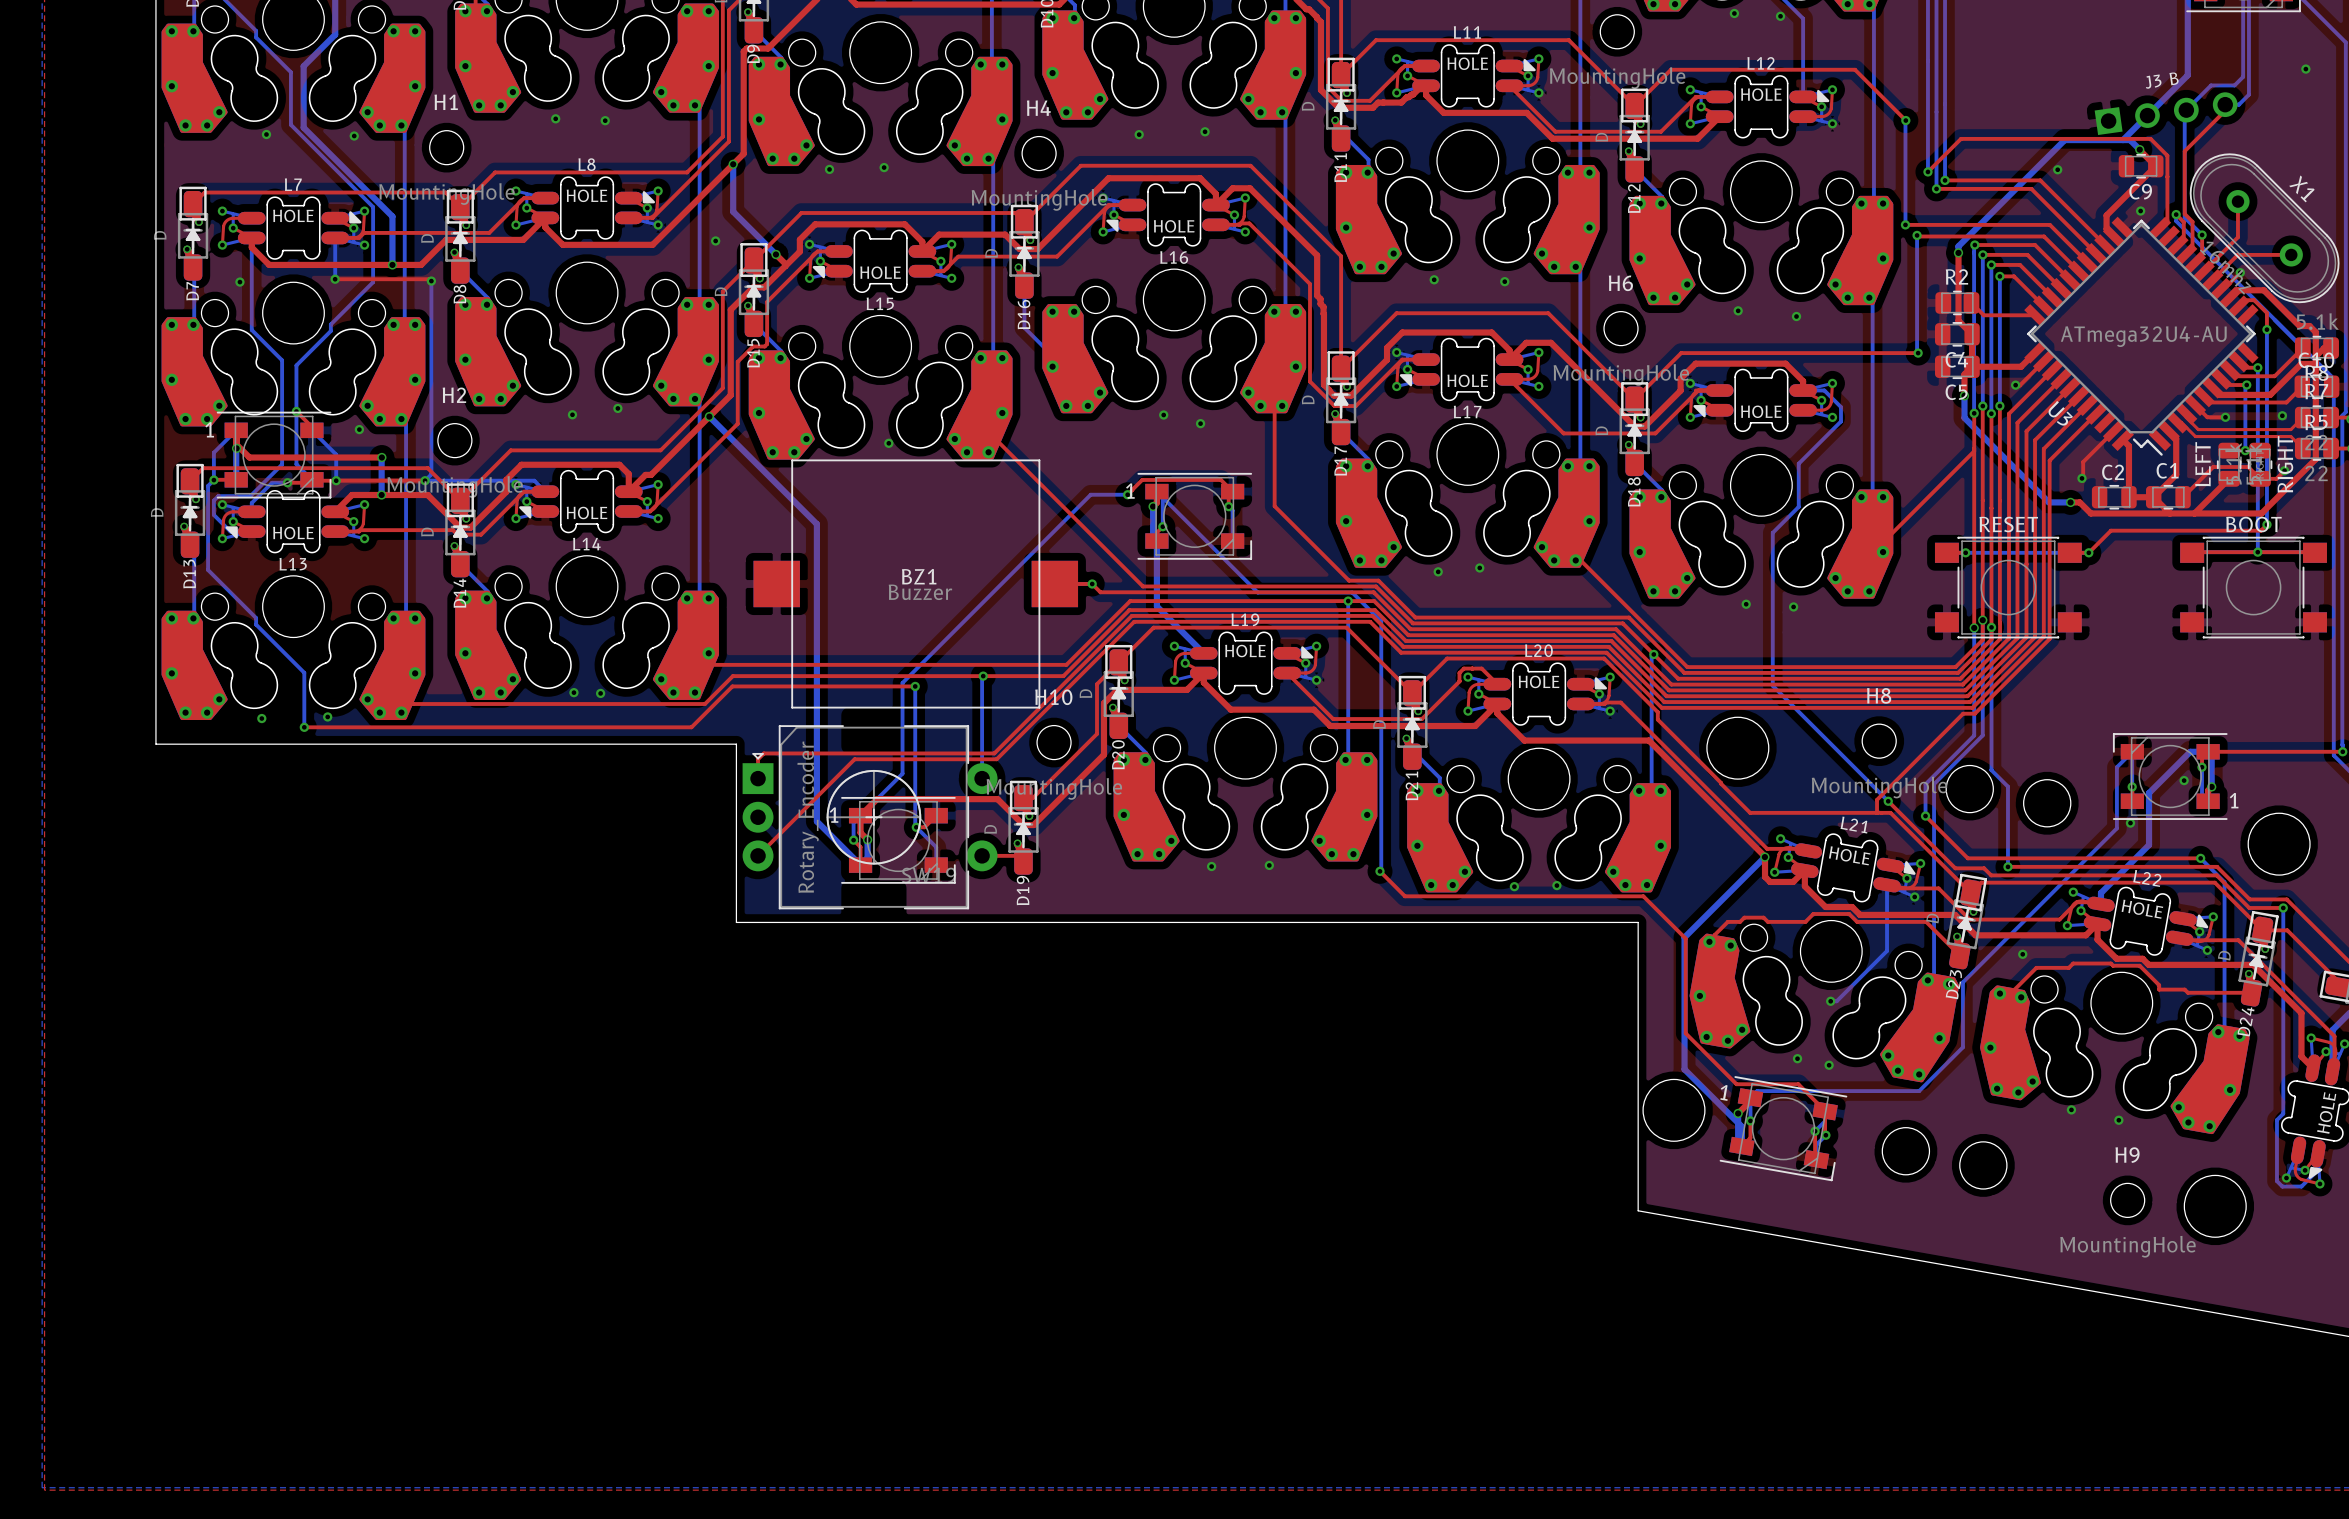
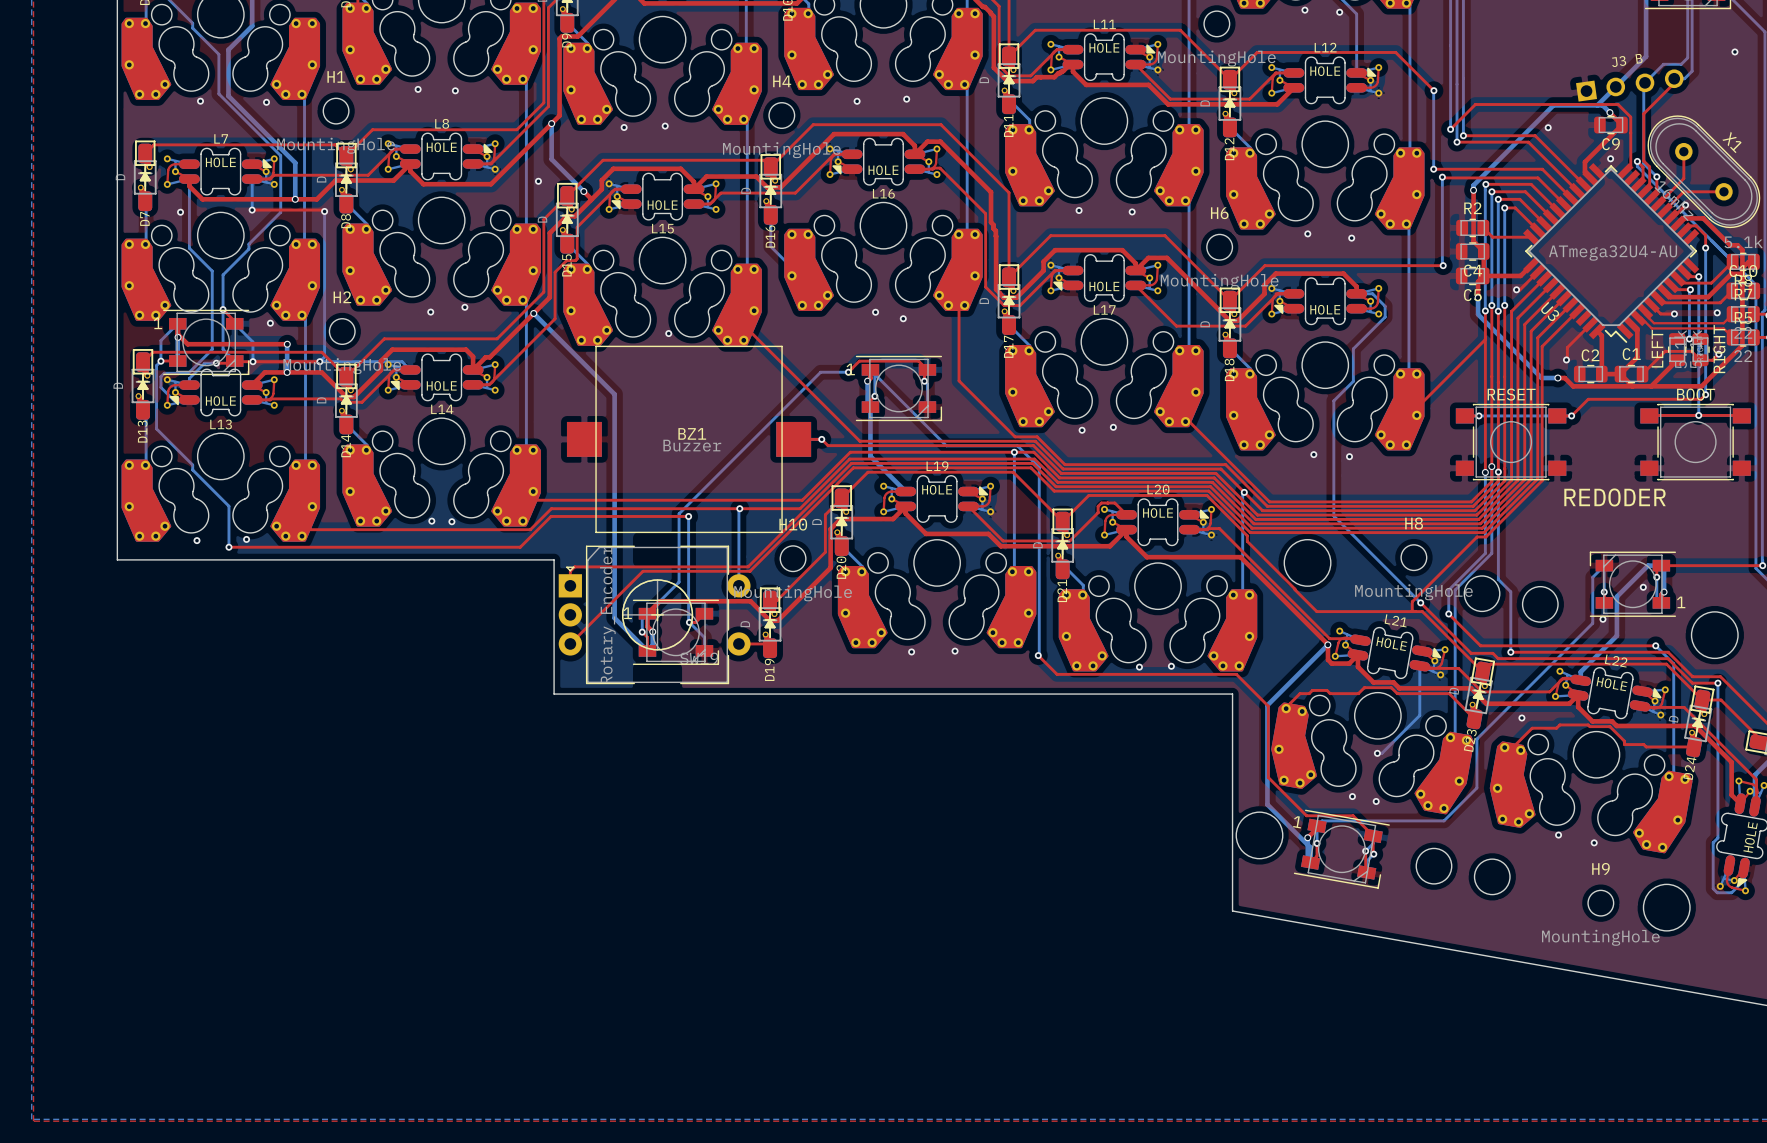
text: none -> REDODER (1615, 497)

